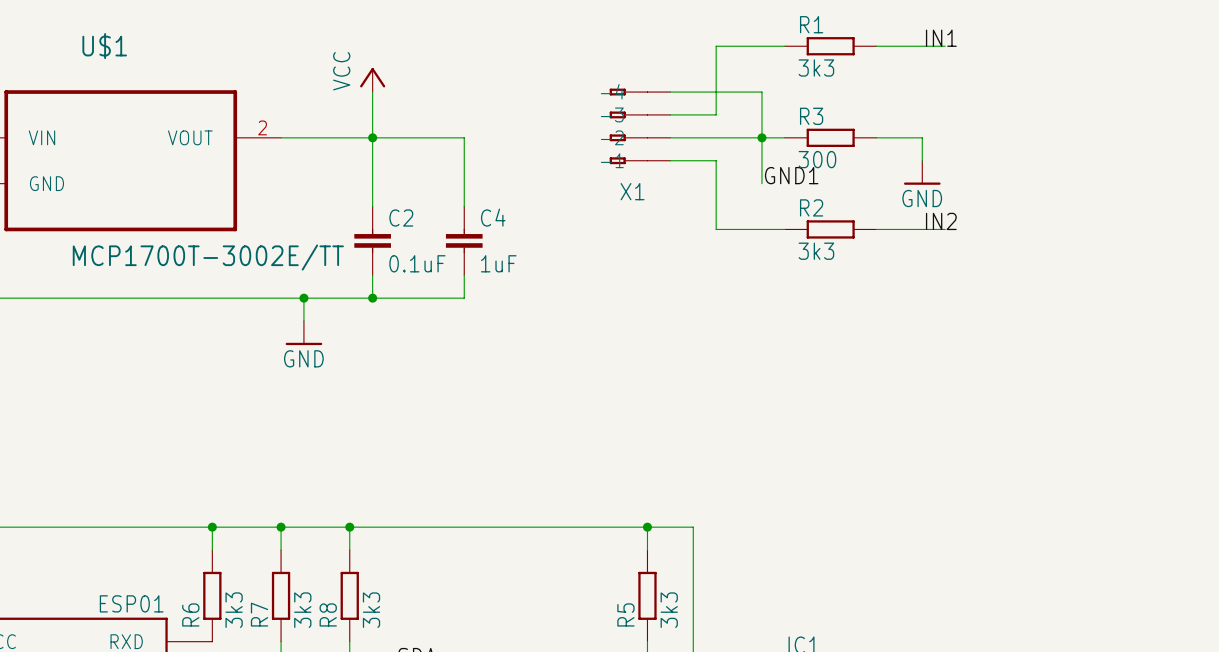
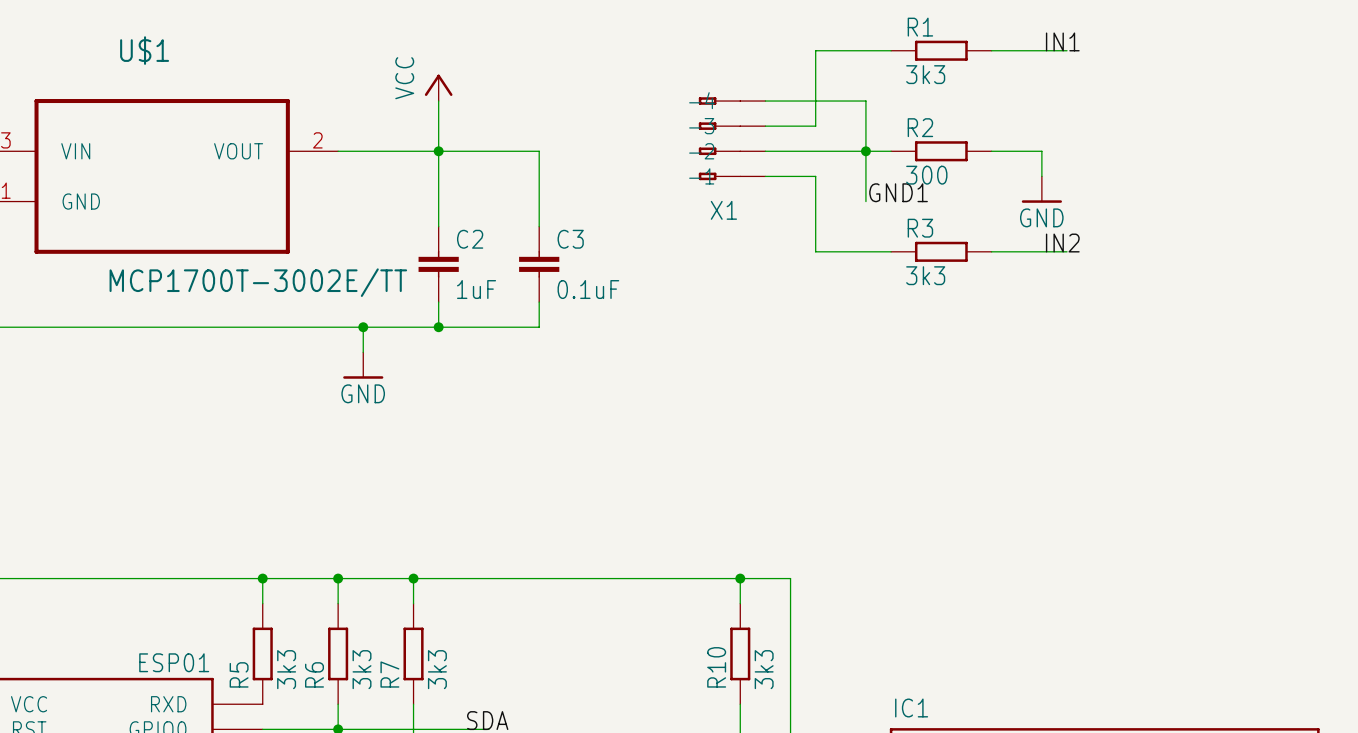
R3 name: R3 (811, 116) -> R2 (920, 127)
R2 name: R2 (811, 207) -> R3 (920, 228)
C4 name: C4 (493, 217) -> C3 (570, 239)
C2 value: 0.1uF (417, 263) -> 1uF (476, 289)
C4 value: 1uF (498, 263) -> 0.1uF (588, 289)
R6 name: R6 (190, 614) -> R5 (239, 674)
R7 name: R7 (259, 614) -> R6 (314, 674)
R8 name: R8 (328, 614) -> R7 (389, 674)
R5 name: R5 (625, 614) -> R10 (716, 667)

